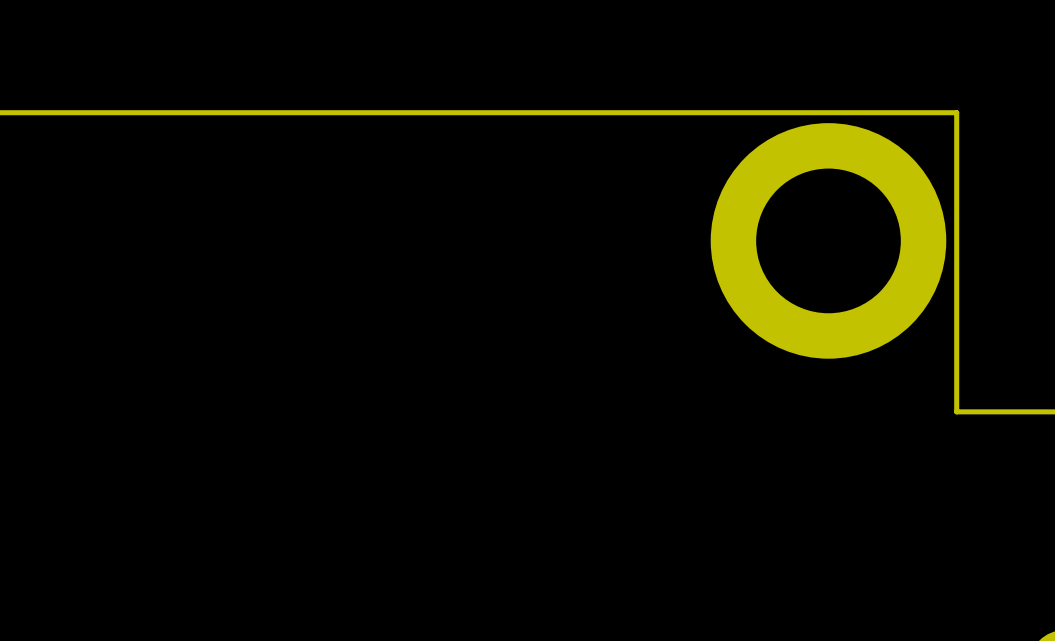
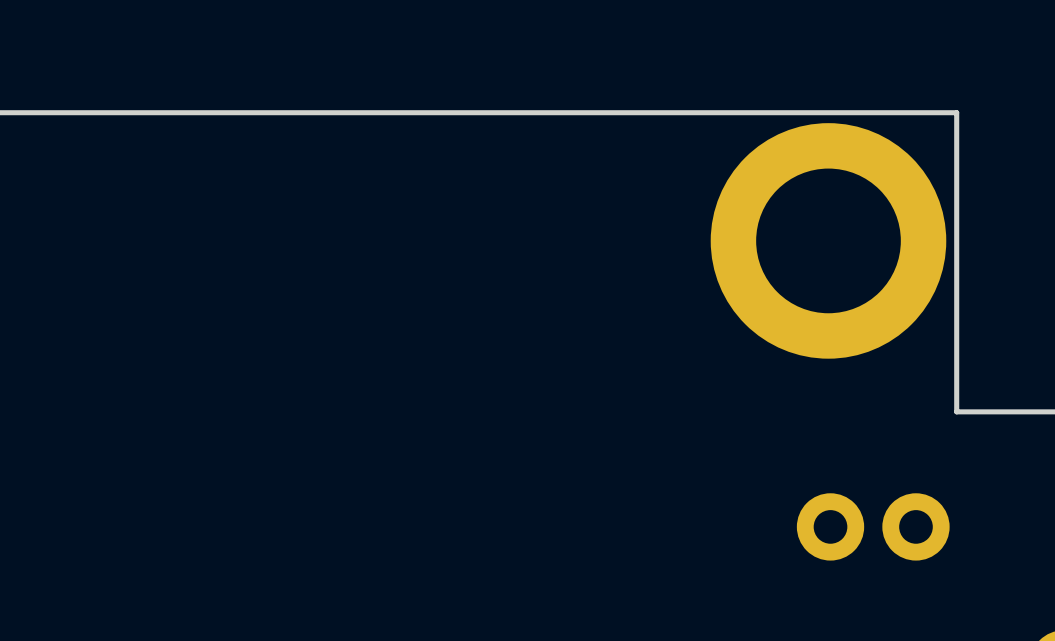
part: none -> (873, 526)

